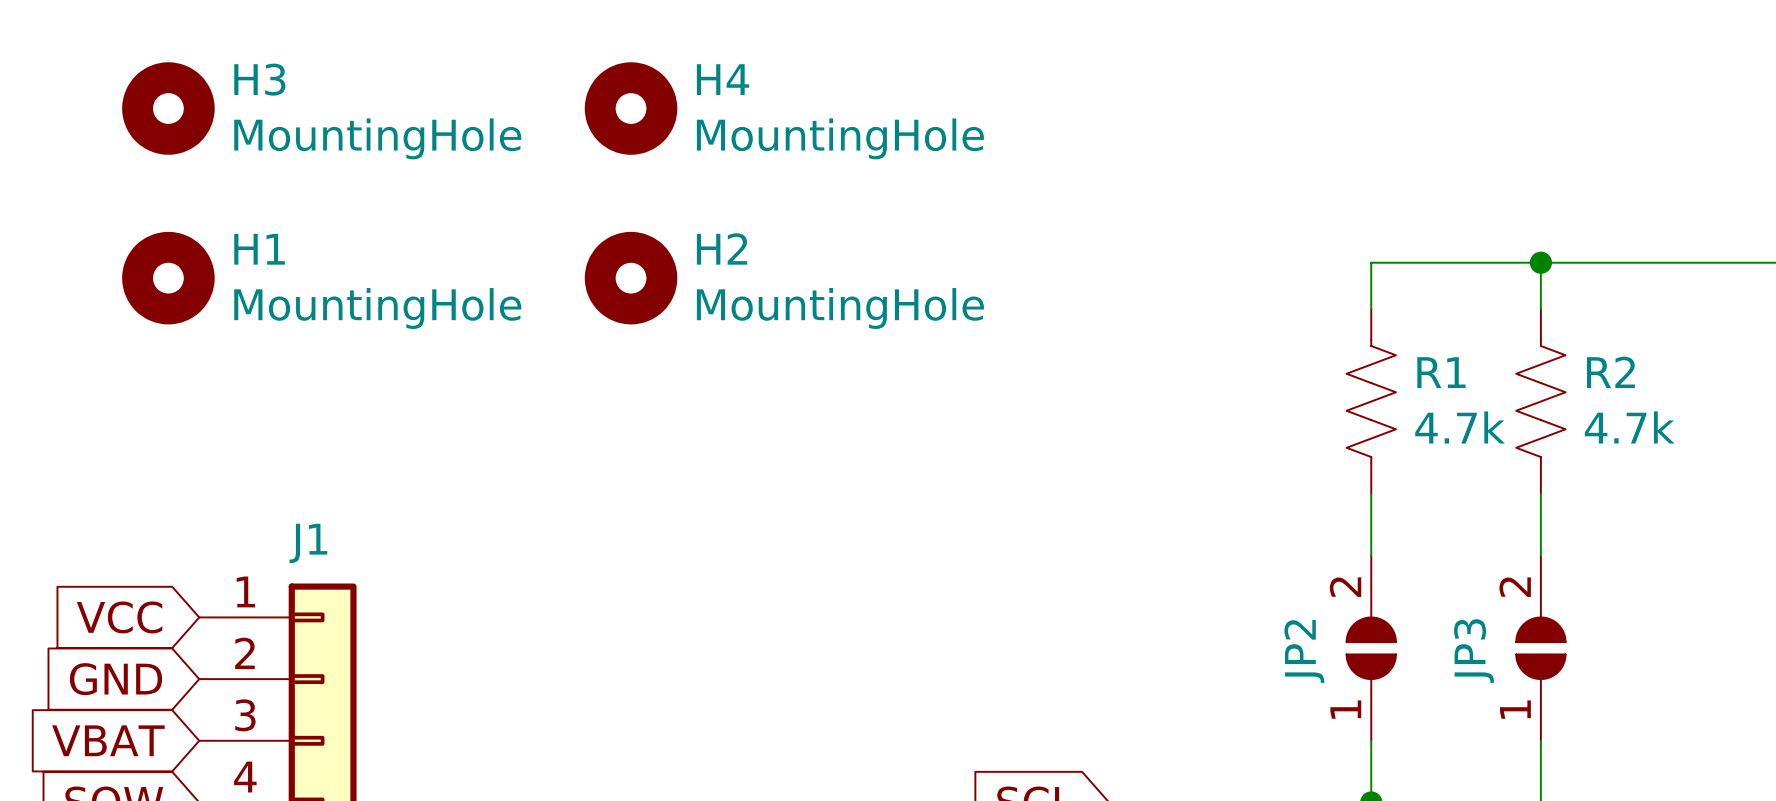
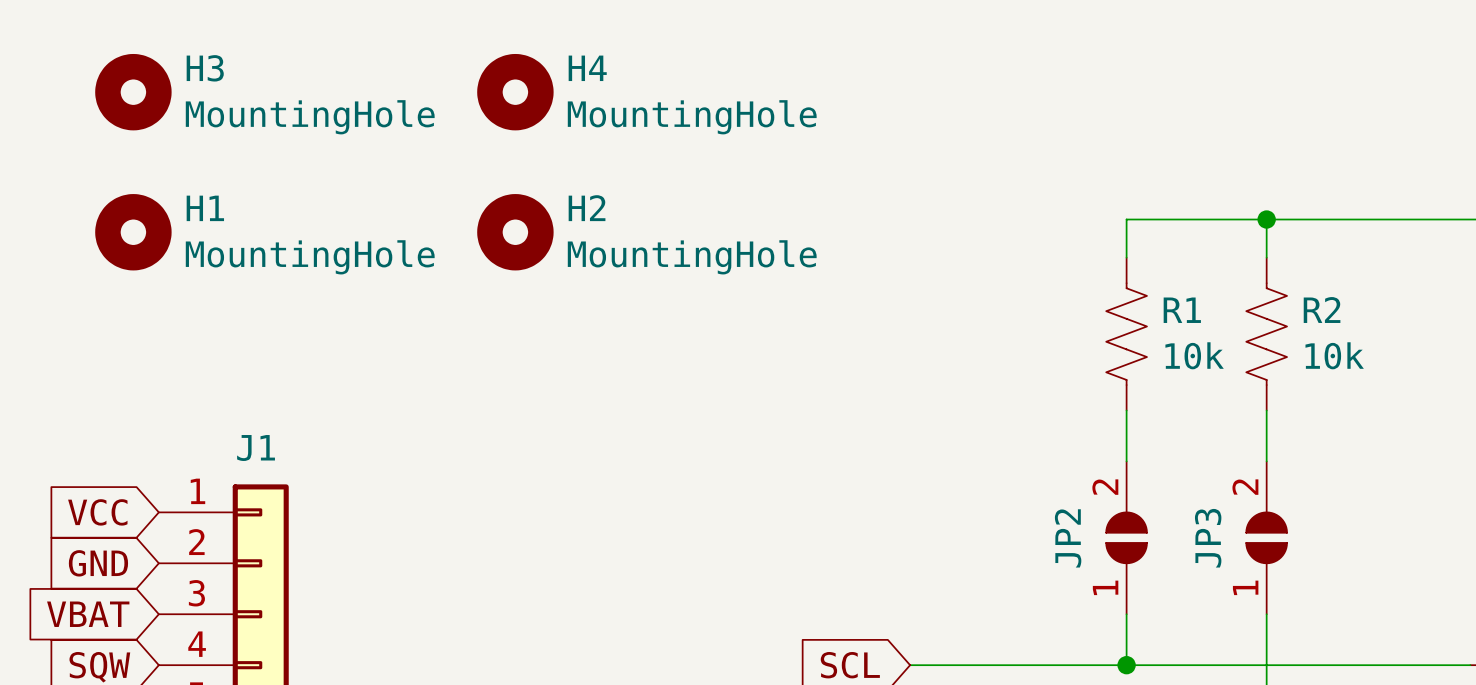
R1 value: 4.7k (1460, 427) -> 10k (1194, 355)
R2 value: 4.7k (1629, 427) -> 10k (1334, 355)

